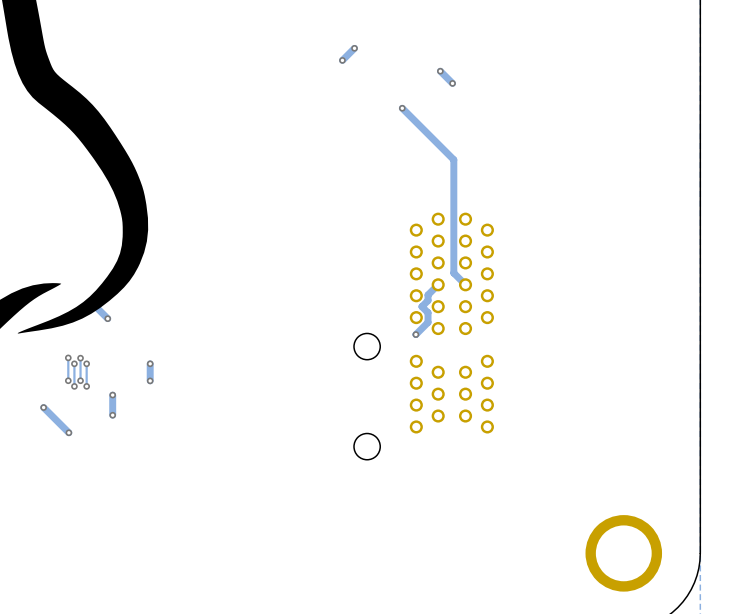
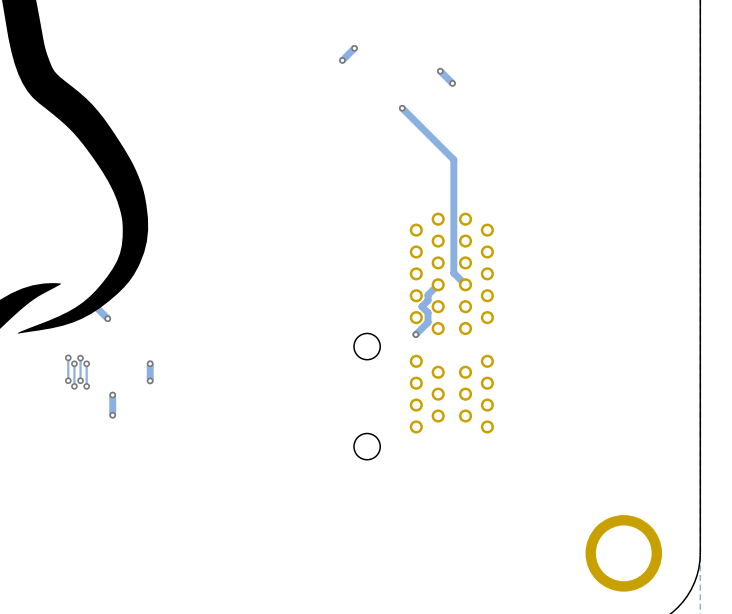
track: (43, 407) (68, 432) -> none
via: (43, 407) -> none
via: (68, 432) -> none

